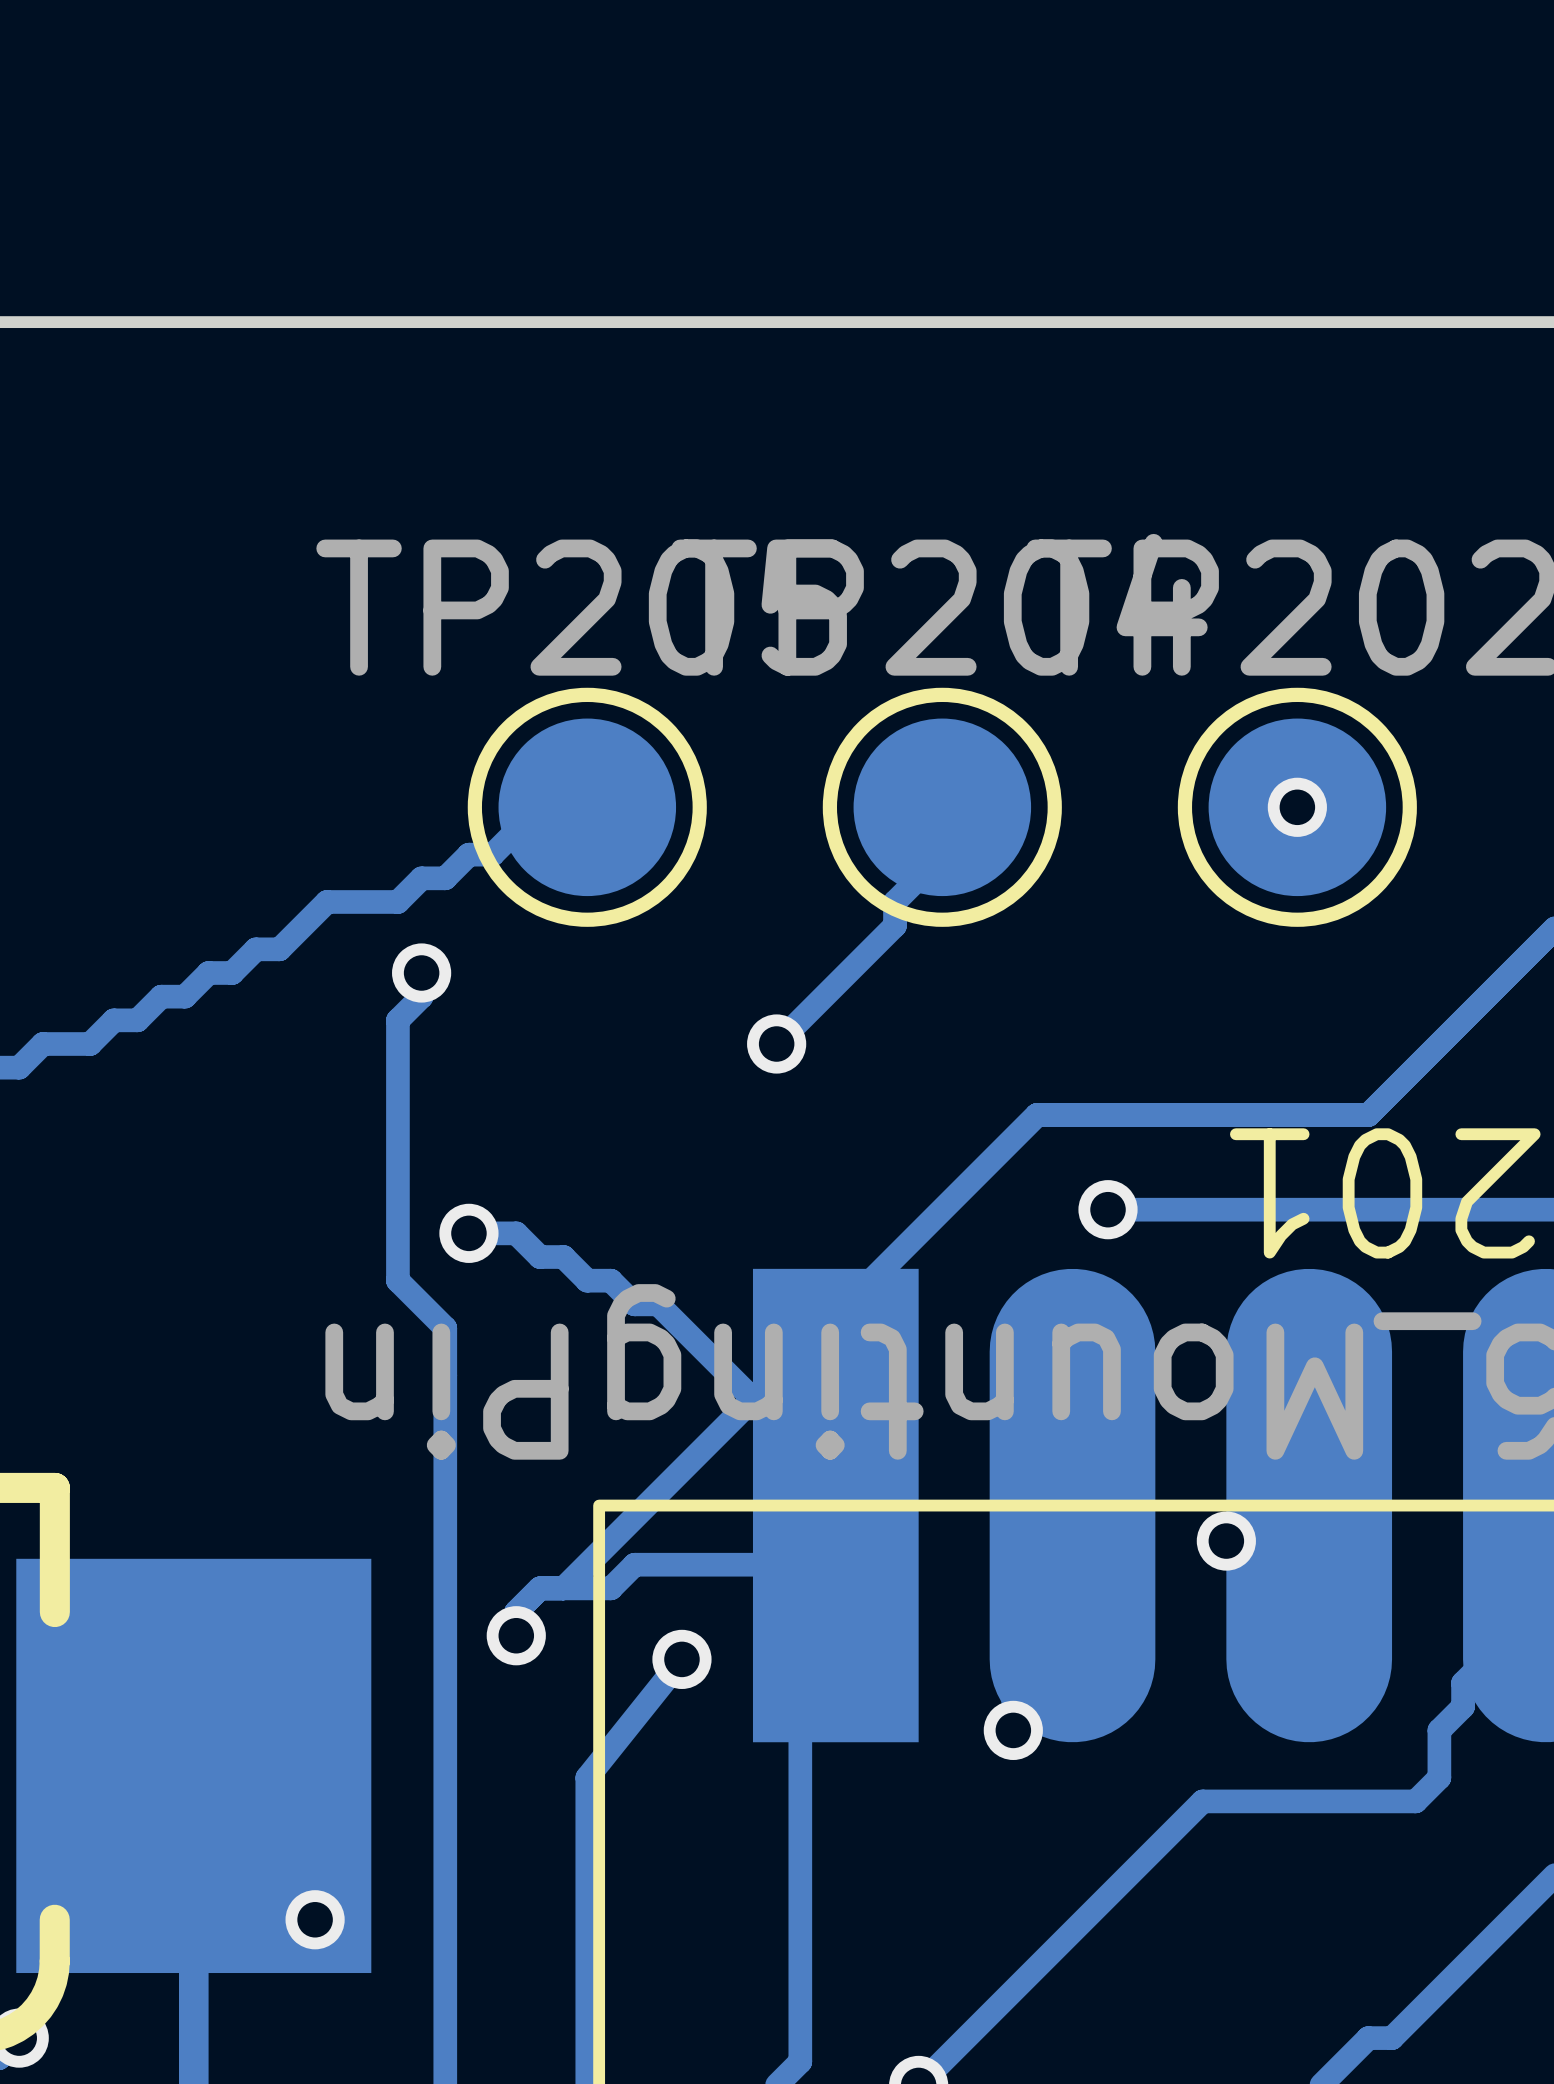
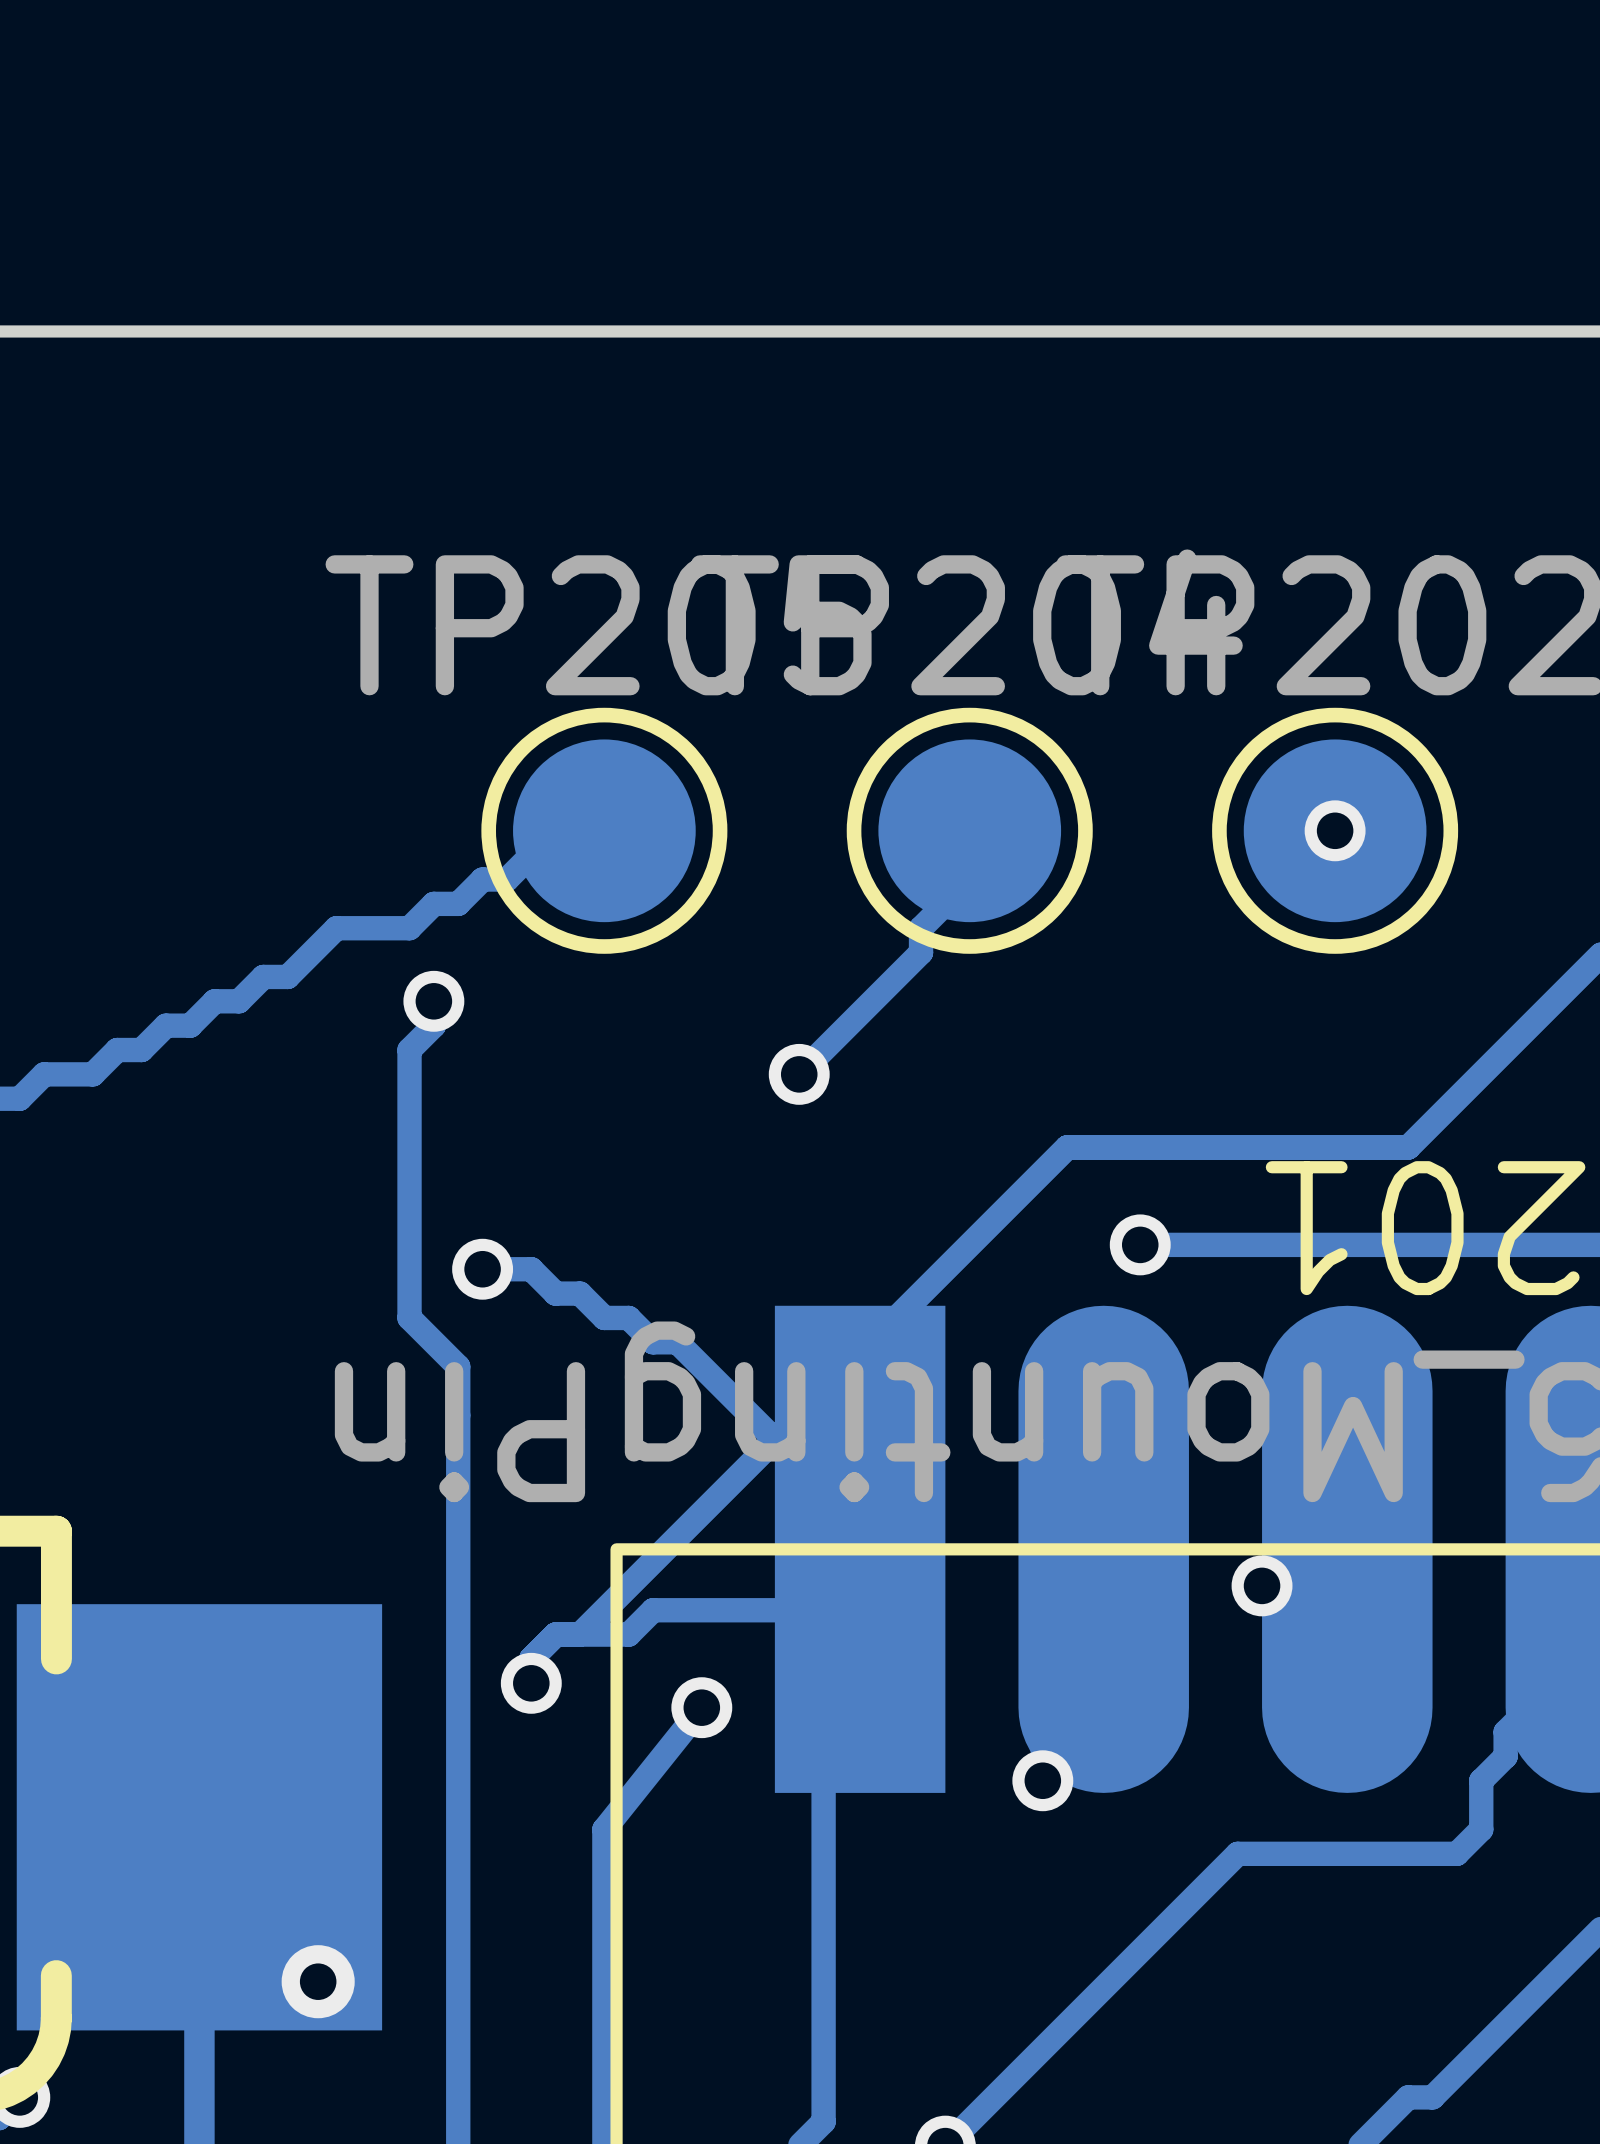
via size: [285, 1890, 345, 1950] -> [281, 1945, 355, 2019]

